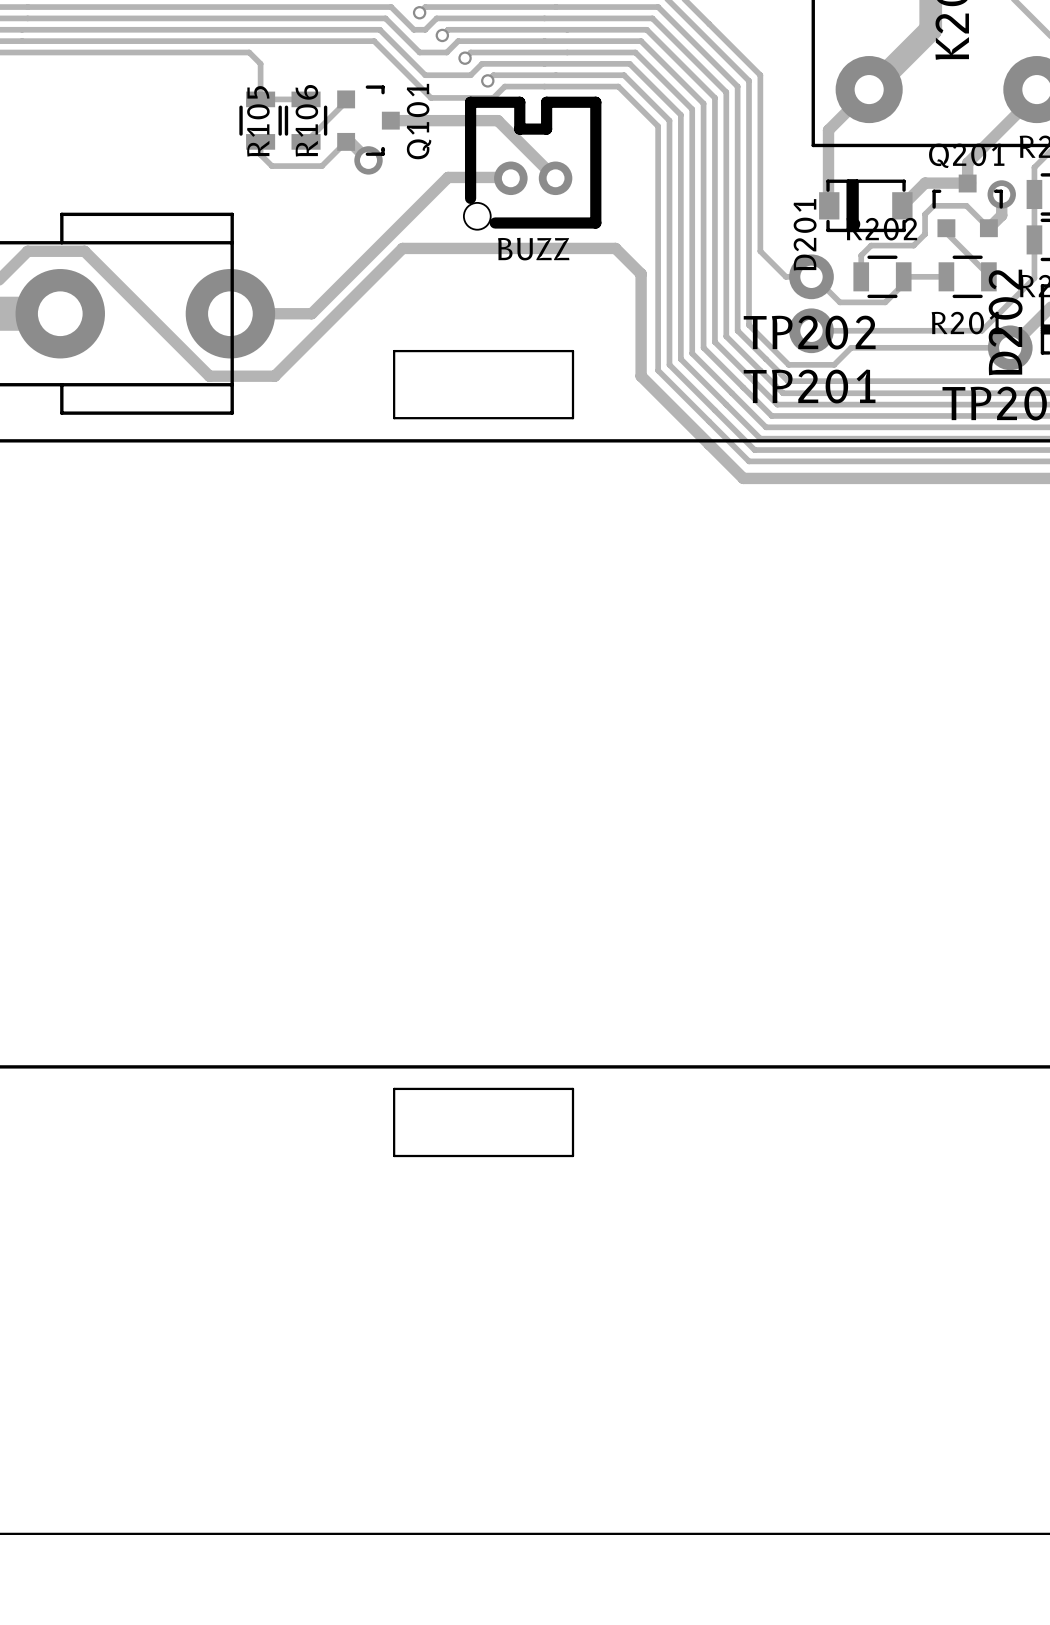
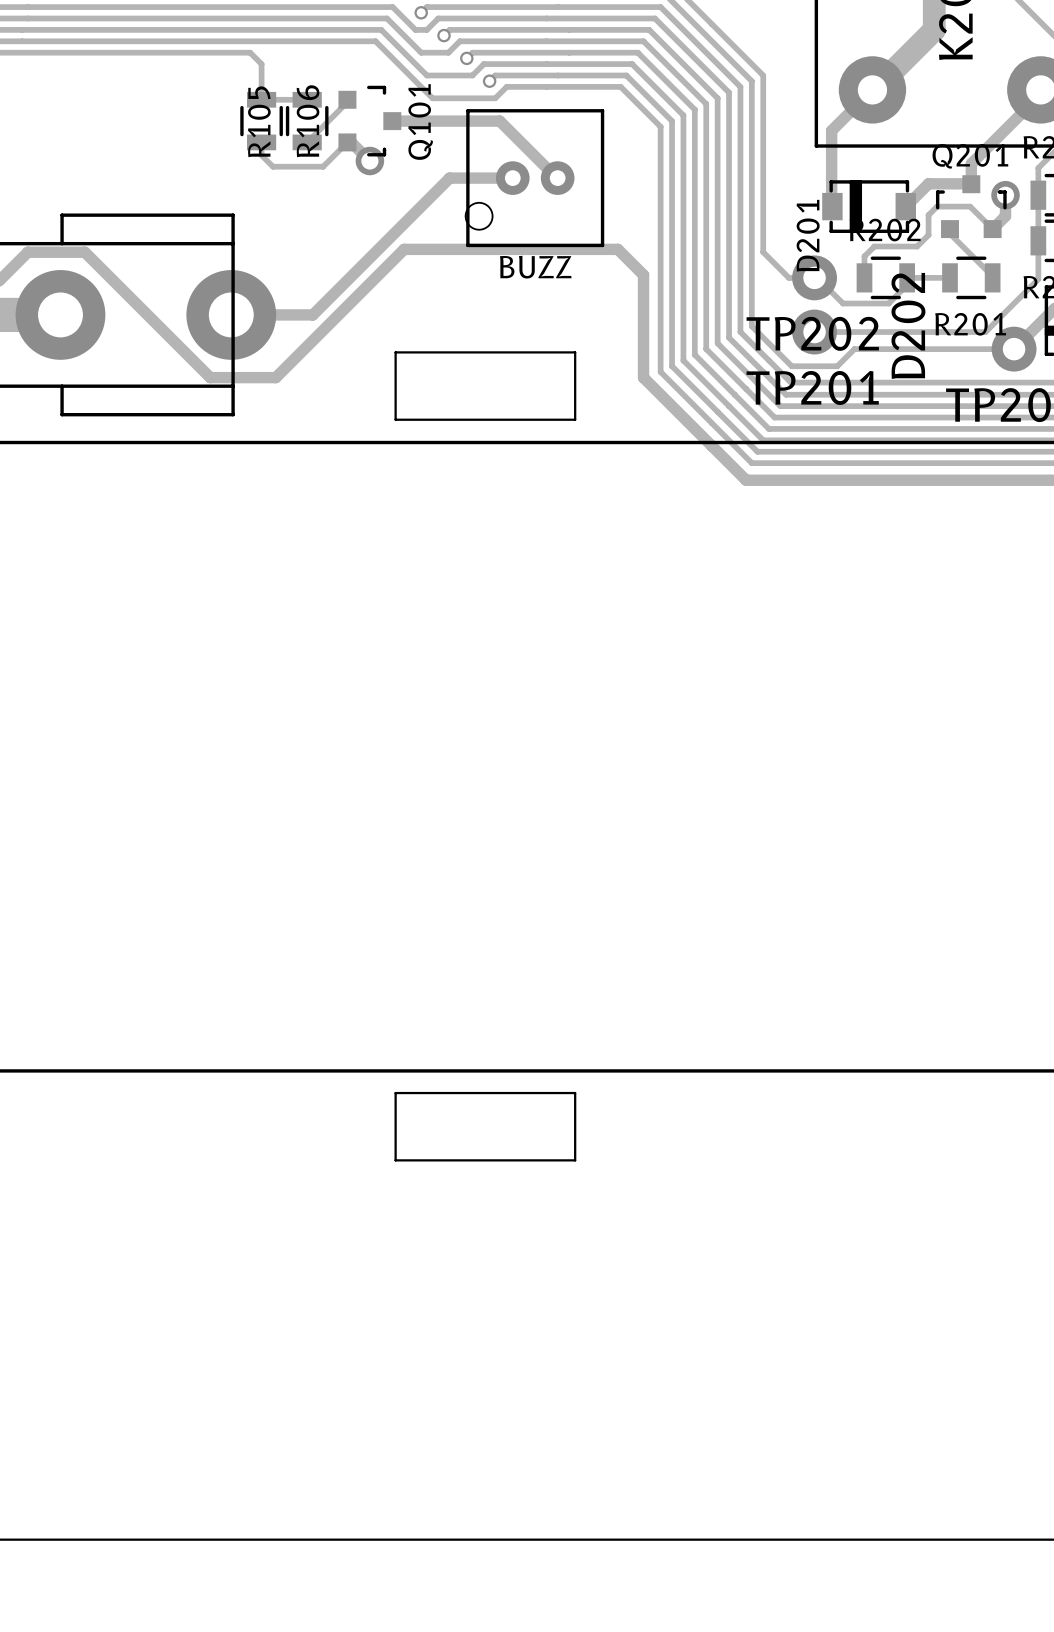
part footprint: [463, 96, 602, 230] -> [465, 109, 605, 248]
D202 name position: D202 (1005, 322) -> D202 (908, 325)

